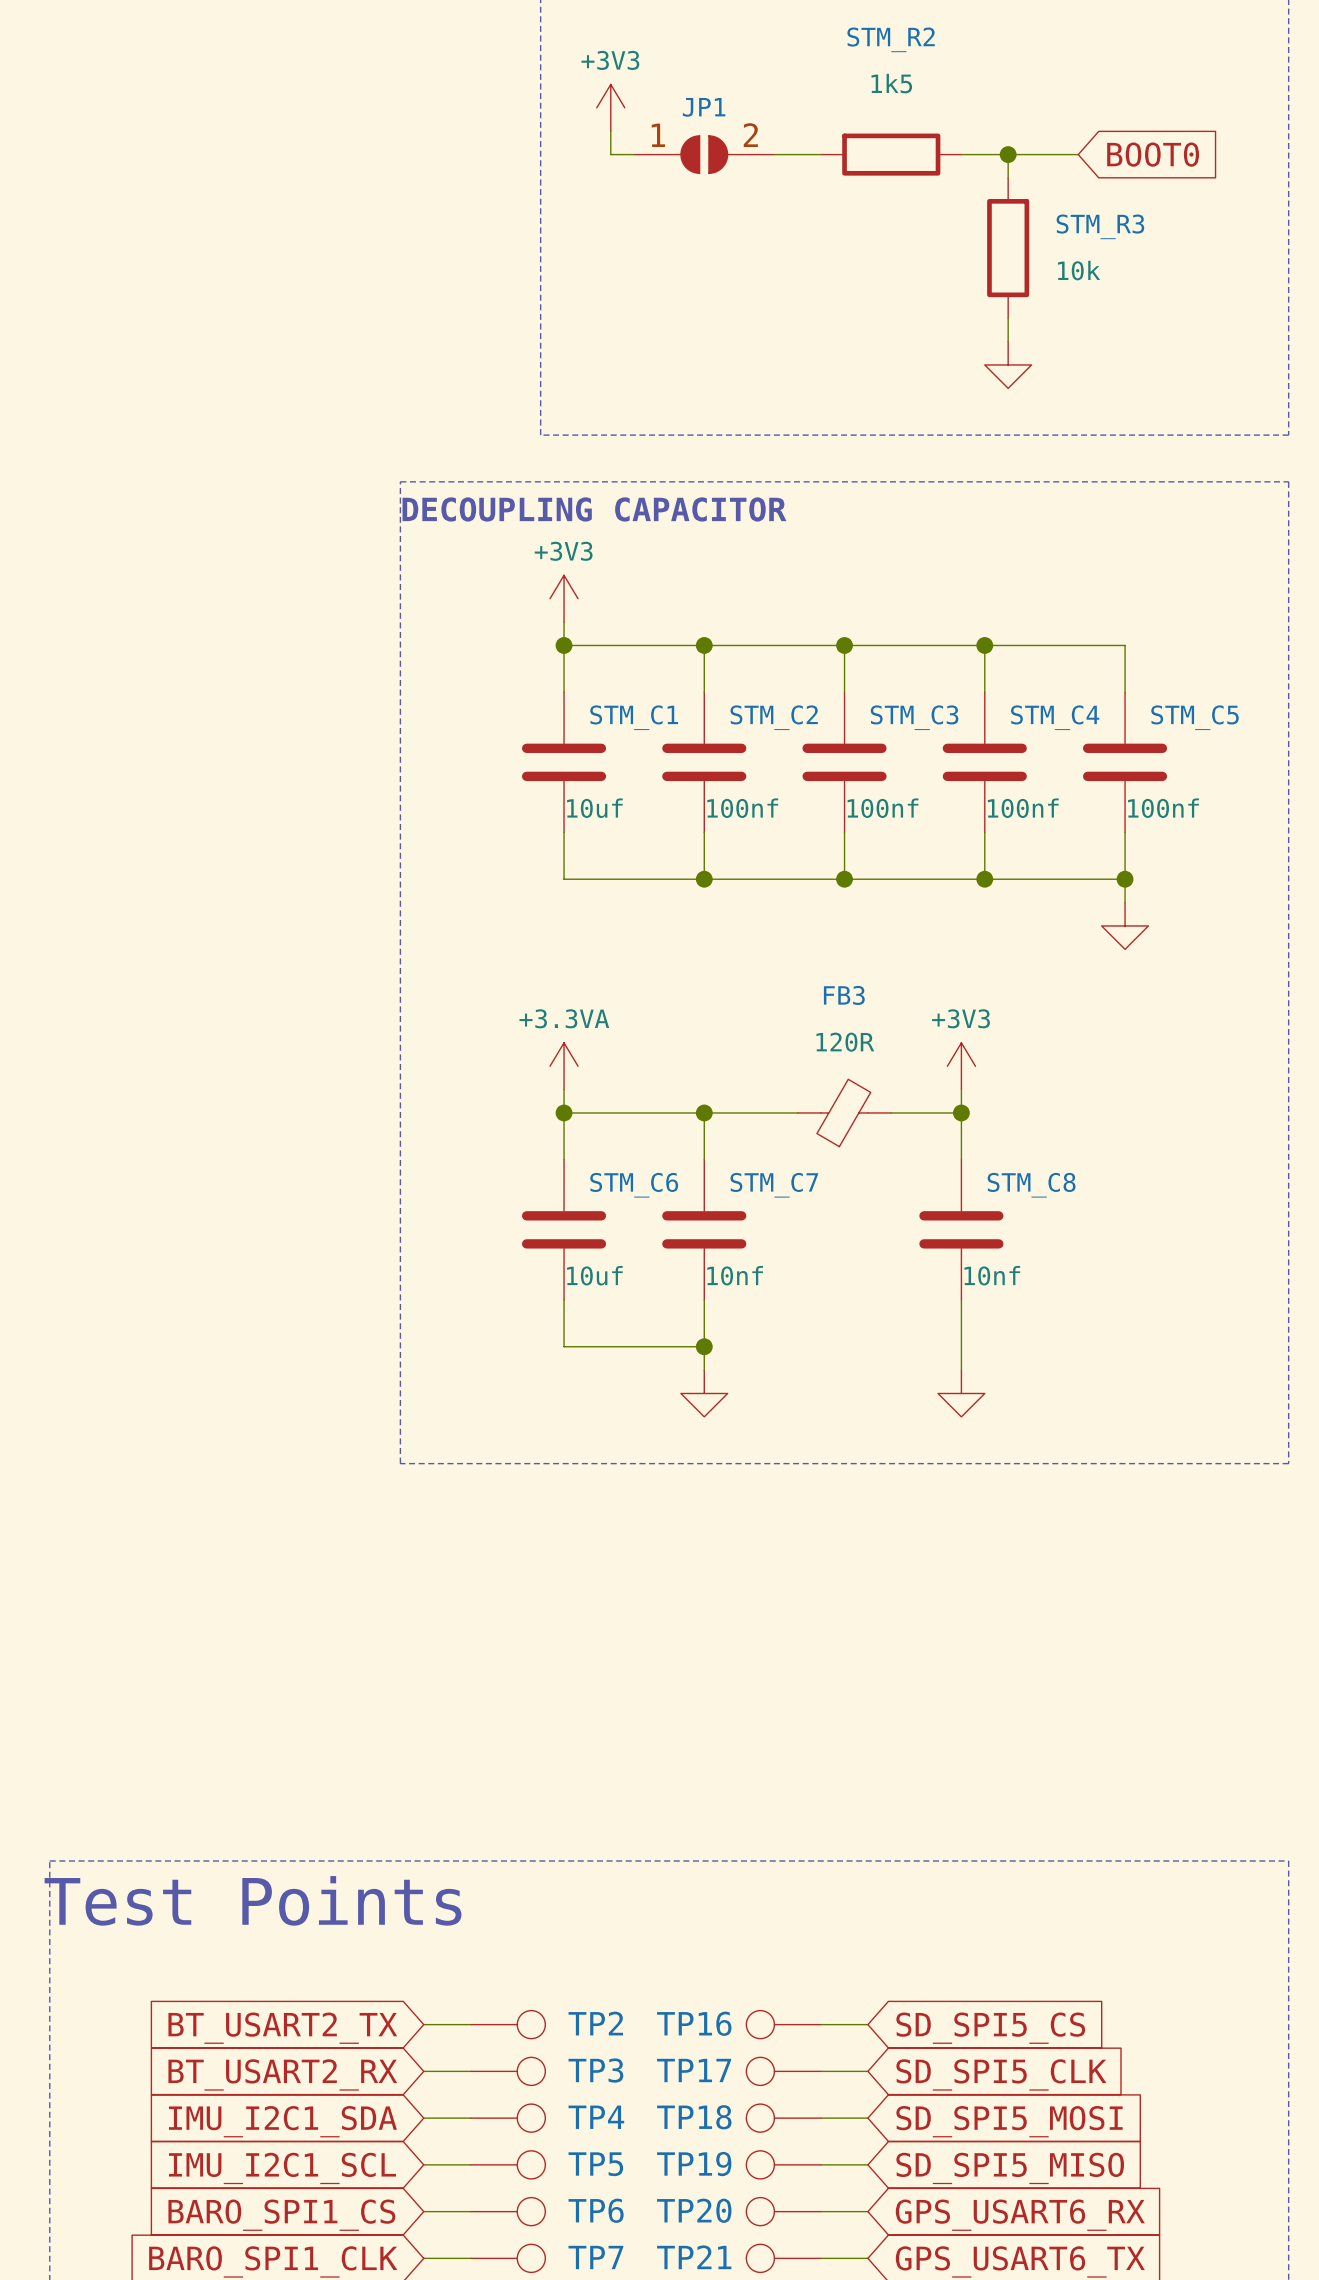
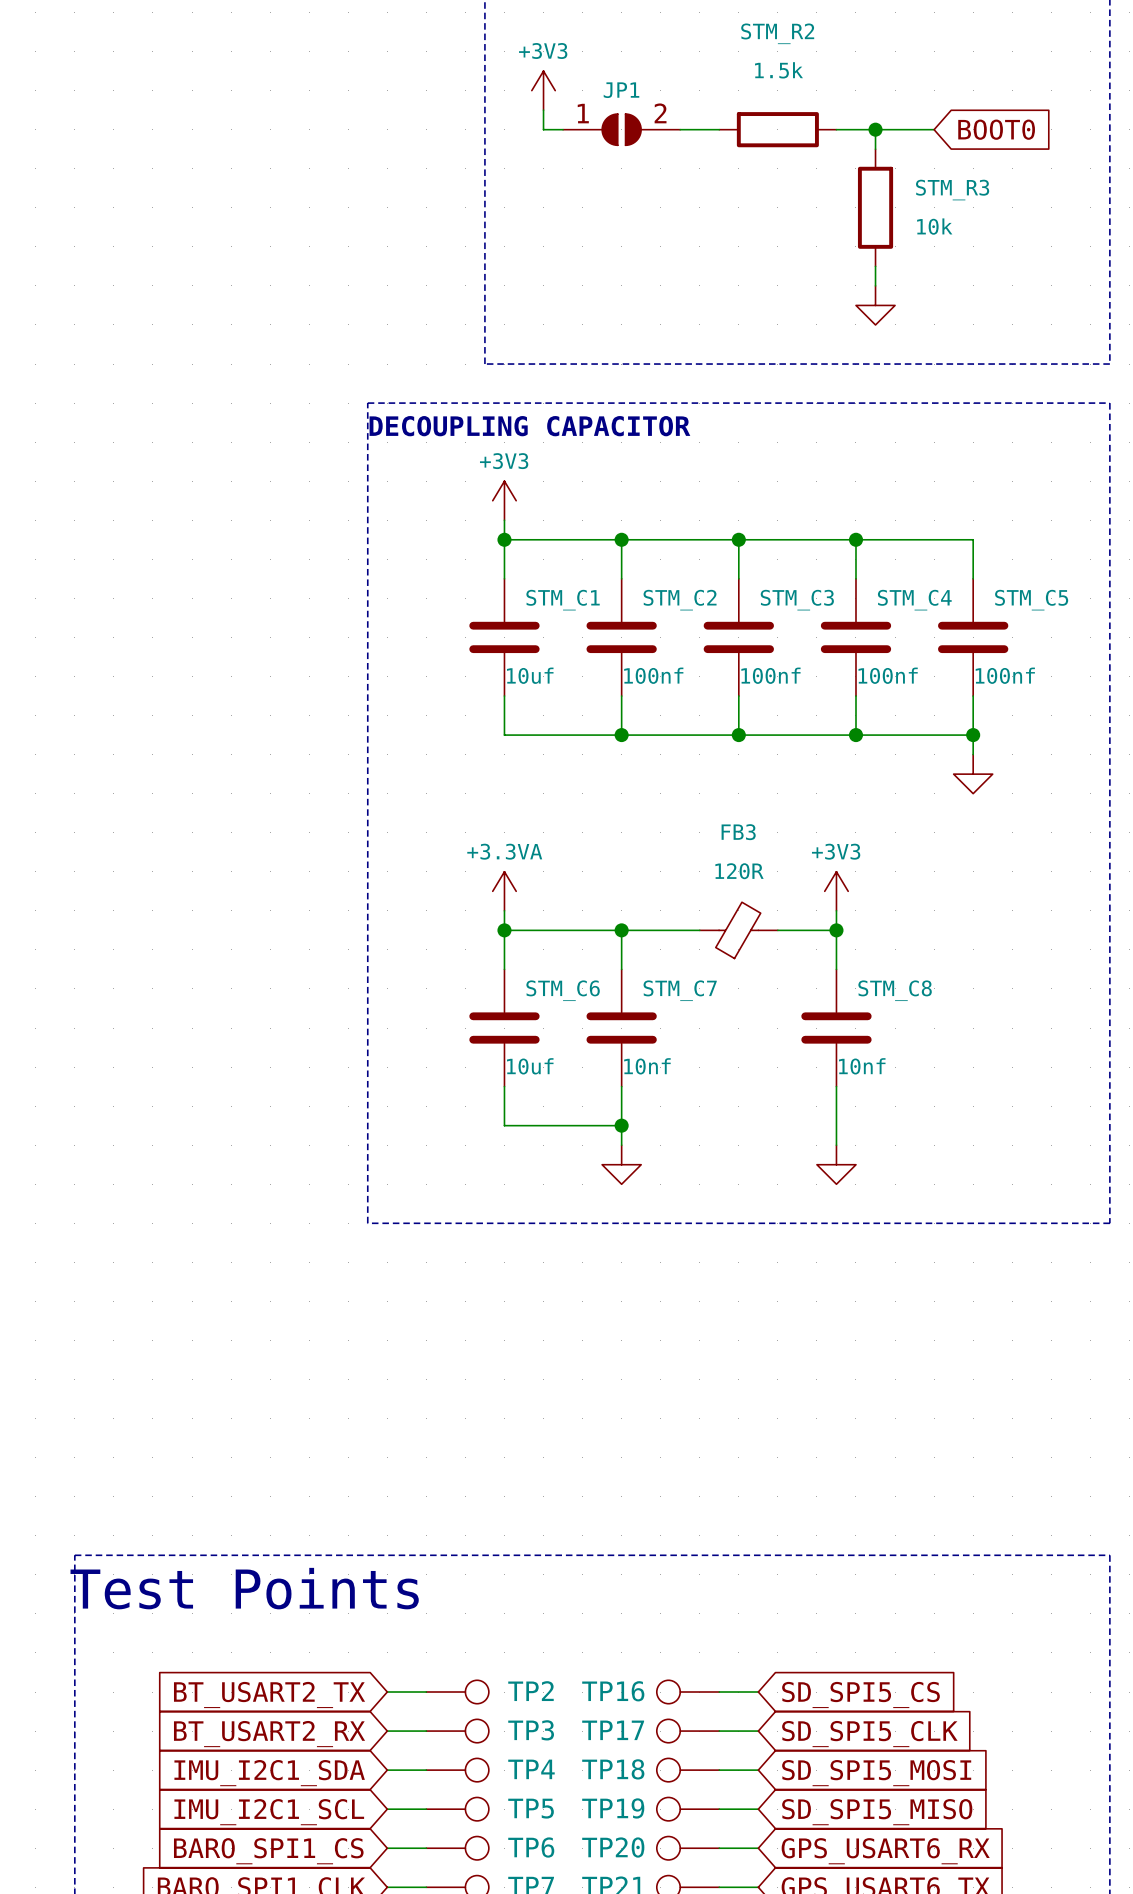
STM_R2 value: 1k5 (891, 83) -> 1.5k (778, 70)

